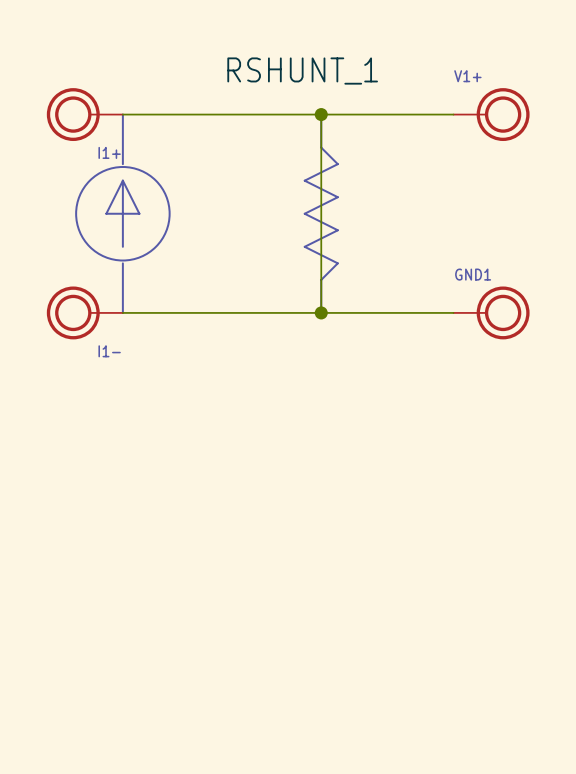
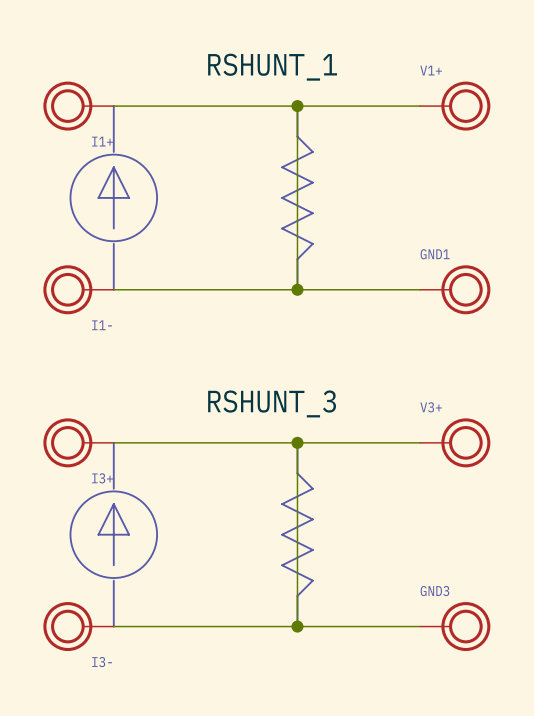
label: none -> RSHUNT_3 (272, 403)
part: none -> I3+ (78, 442)
line: none -> (113, 442) (113, 488)
wire: none -> (113, 442) (419, 442)
line: none -> (297, 442) (297, 473) (312, 488) (282, 504) (312, 519) (282, 534) (312, 550) (282, 565) (312, 580) (297, 595) (297, 626)
wire: none -> (297, 442) (297, 626)
junction: none -> (297, 442)
part: none -> V3+ (455, 442)
drawing: none -> [69, 490, 159, 579]
line: none -> (113, 504) (113, 565)
line: none -> (113, 504) (98, 534) (129, 534) (113, 504)
line: none -> (113, 580) (113, 626)
part: none -> I3- (78, 626)
wire: none -> (113, 626) (419, 626)
junction: none -> (297, 626)
part: none -> GND3 (455, 626)

